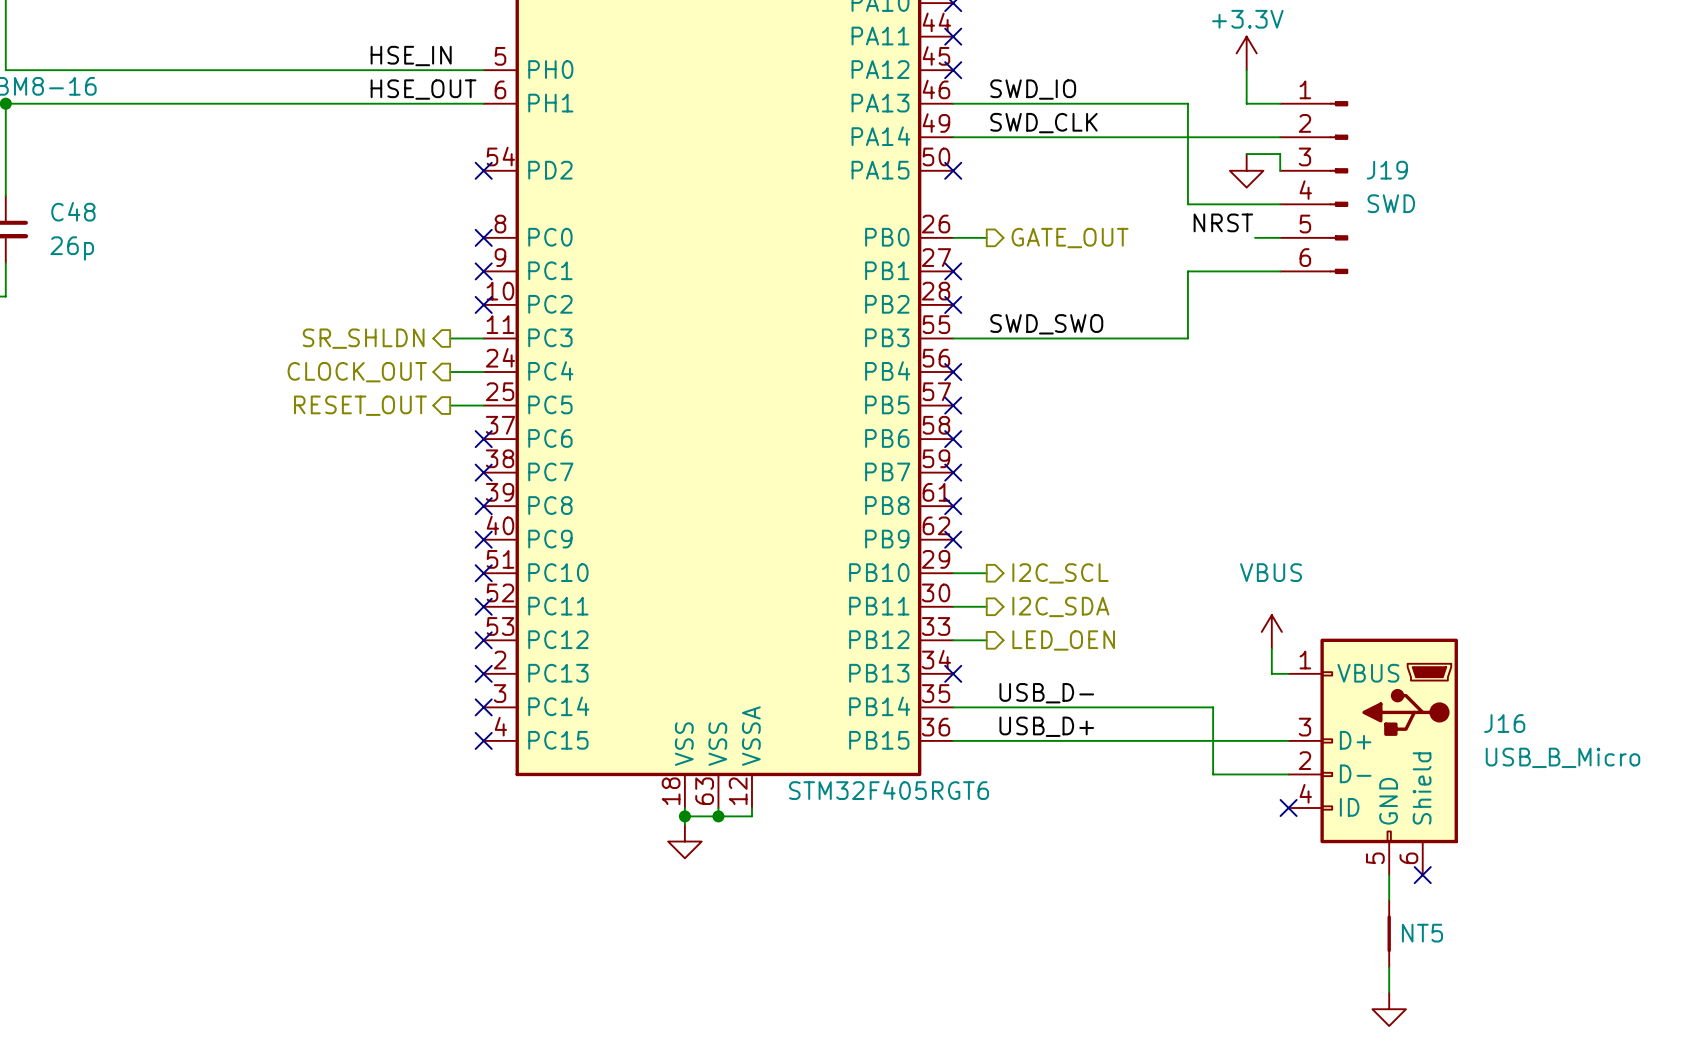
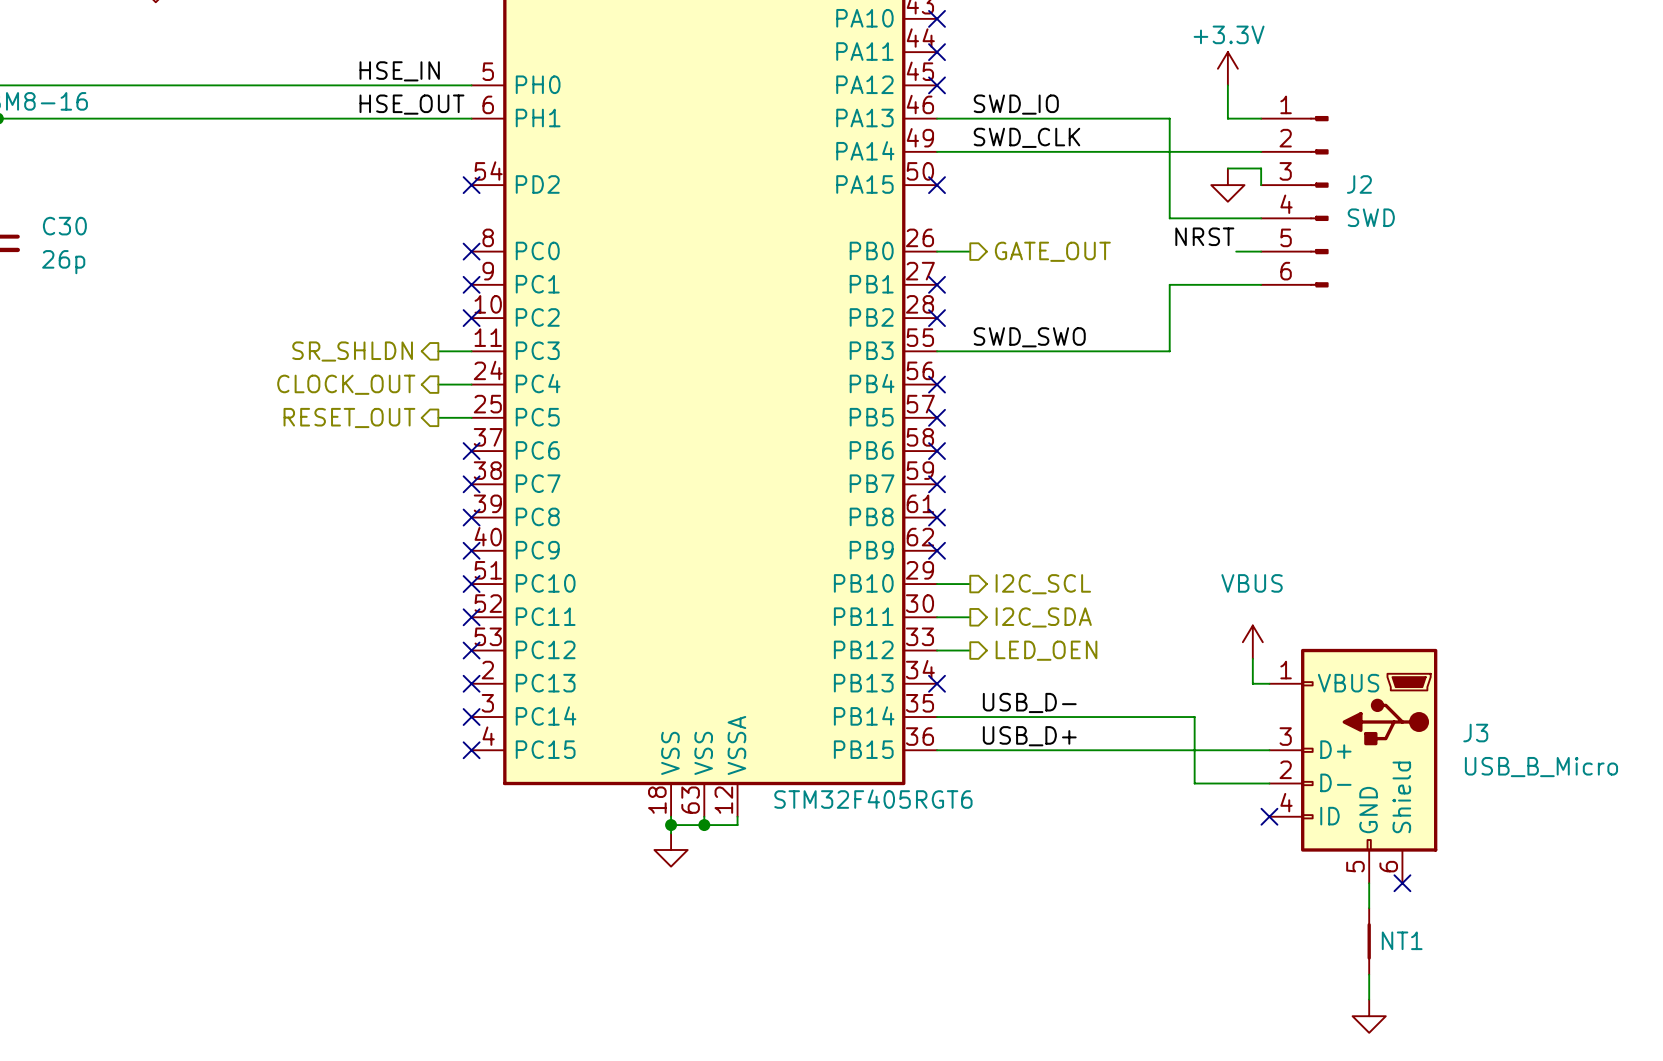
J19 name: J19 (1387, 170) -> J2 (1359, 184)
C48 name: C48 (73, 211) -> C30 (64, 226)
J16 name: J16 (1504, 723) -> J3 (1475, 733)
NT5 name: NT5 (1422, 933) -> NT1 (1402, 940)

